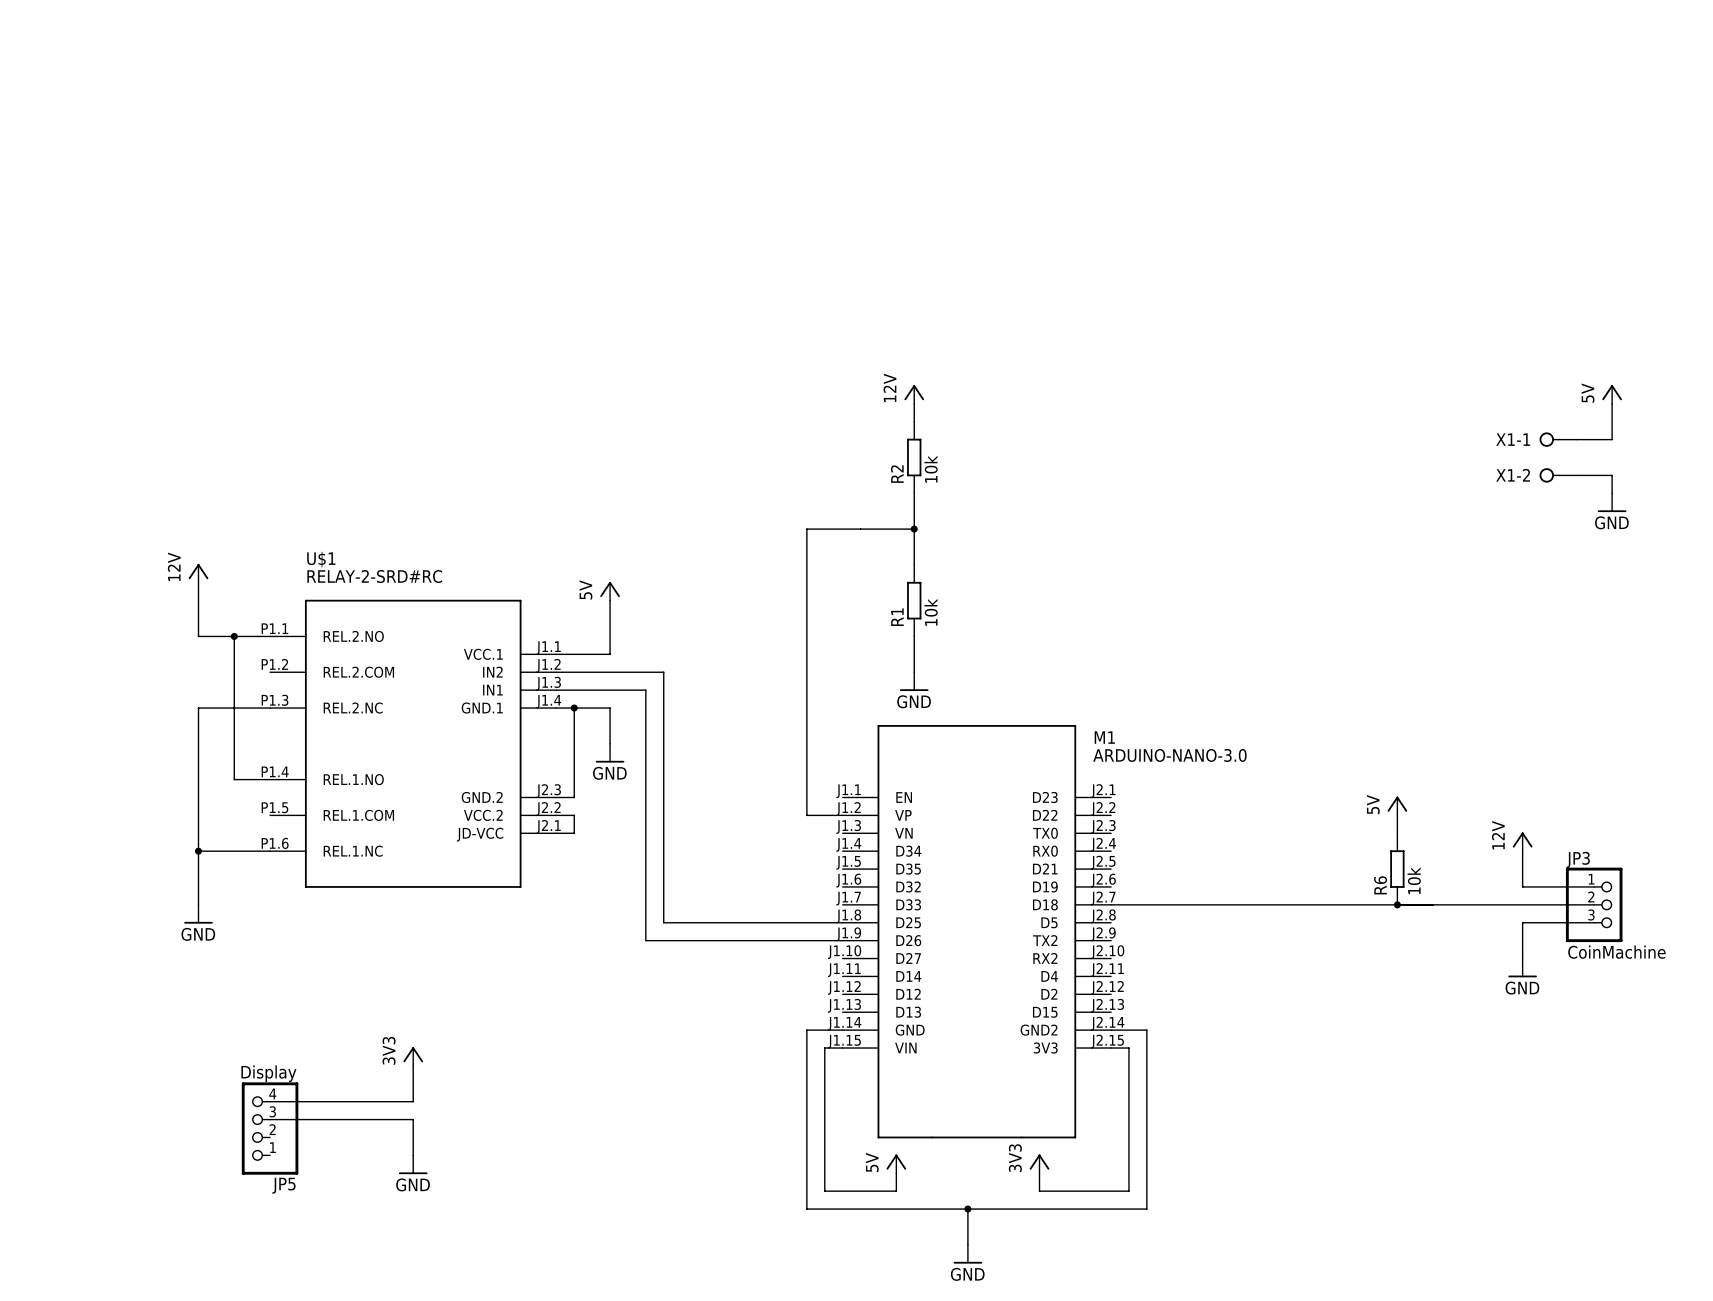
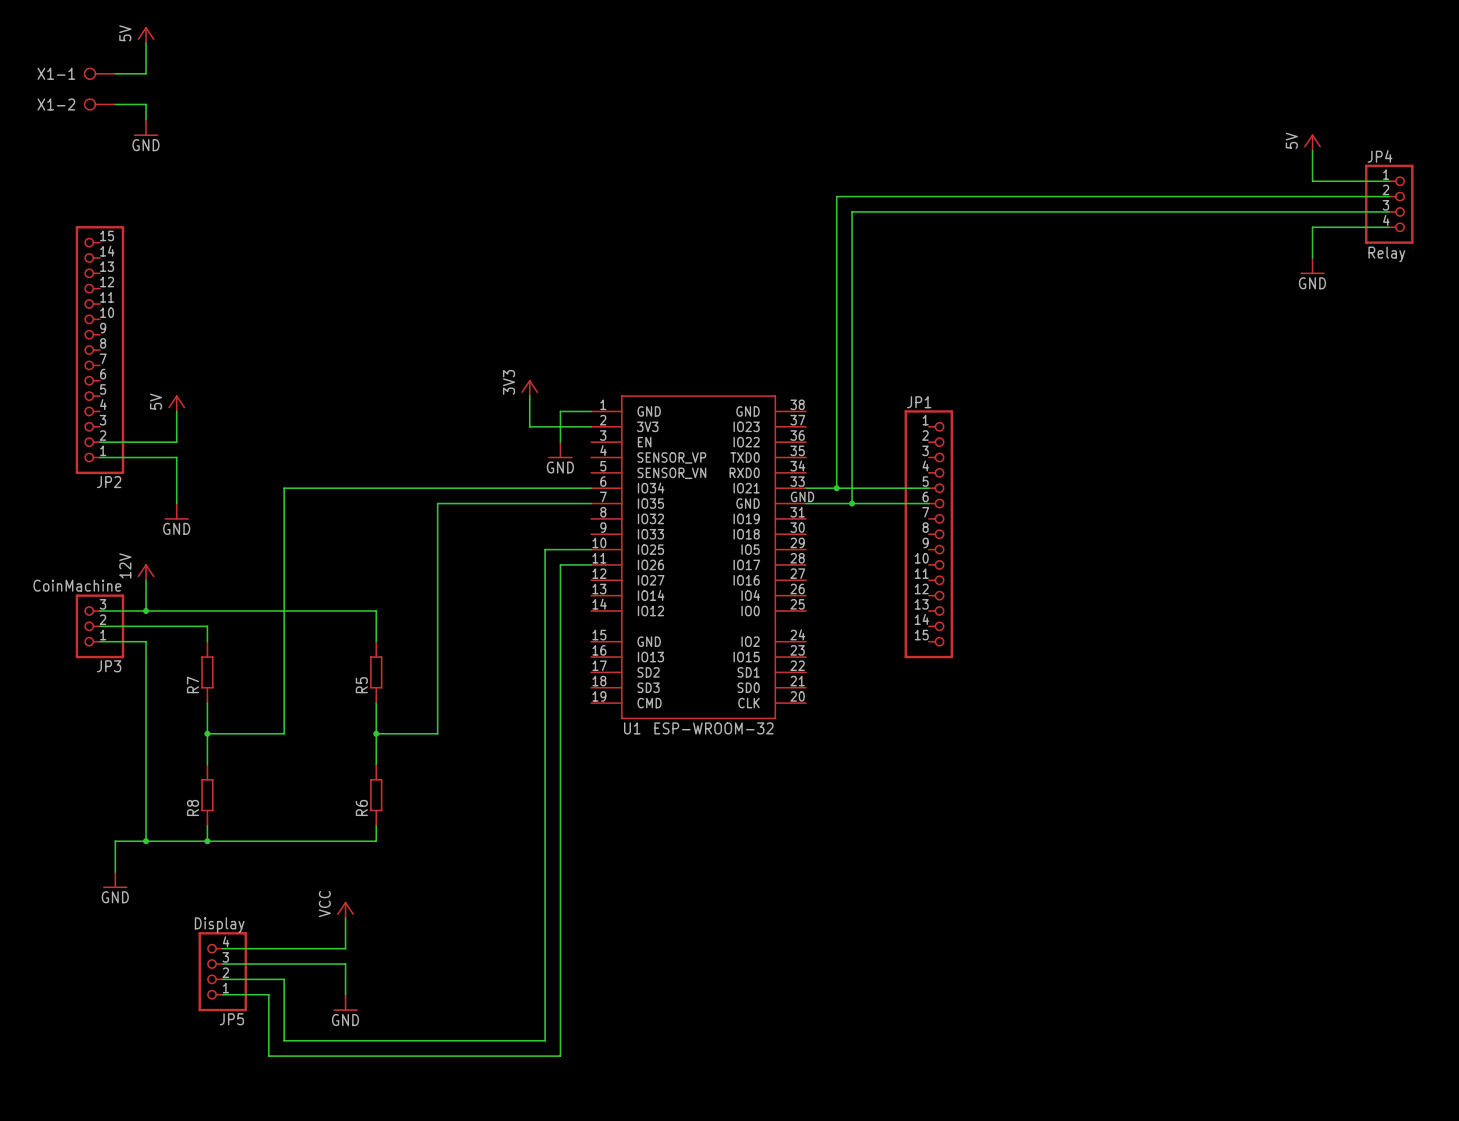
power symbol: none -> 5V (146, 35)
wire: none -> (146, 43) (146, 73) (115, 73)
wire: none -> (115, 104) (146, 104) (146, 119)
power symbol: none -> GND (146, 127)
power symbol: none -> 5V (1312, 142)
wire: none -> (1312, 150) (1312, 181) (1389, 181)
wire: none -> (1389, 196) (836, 196) (836, 488)
JP4: none -> Relay (1389, 204)
wire: none -> (1389, 211) (852, 211) (852, 503)
wire: none -> (1389, 227) (1312, 227) (1312, 257)
power symbol: none -> GND (1312, 266)
power symbol: 12V (914, 394) -> none
power symbol: 5V (1612, 394) -> none
JP2: none -> (99, 350)
wire: (914, 403) (914, 421) -> none
wire: (1612, 403) (1612, 439) (1576, 439) -> none
X1-1 position: (1557, 439) -> (99, 73)
power symbol: none -> 3V3 (529, 388)
wire: none -> (529, 396) (529, 426) (591, 426)
R2: 10k (914, 457) -> none
power symbol: none -> 5V (176, 403)
wire: none -> (176, 411) (176, 442) (99, 442)
wire: none -> (591, 411) (560, 411) (560, 442)
X1-2 position: (1557, 475) -> (99, 104)
wire: (1576, 475) (1612, 475) (1612, 493) -> none
power symbol: GND (1612, 502) -> none
power symbol: none -> GND (560, 450)
wire: none -> (99, 457) (176, 457) (176, 503)
wire: (914, 529) (806, 529) (806, 815) (842, 815) -> none
junction: (914, 529) -> none
wire: none -> (591, 488) (284, 488) (284, 733) (222, 733)
wire: none -> (806, 488) (928, 488)
junction: none -> (836, 488)
power symbol position: 12V (198, 573) -> 12V (146, 572)
wire: (198, 582) (198, 636) (270, 636) -> none
wire: none -> (591, 503) (437, 503) (437, 733) (376, 733)
wire: none -> (806, 503) (928, 503)
junction: none -> (852, 503)
power symbol: 5V (610, 591) -> none
power symbol: none -> GND (176, 511)
wire: (610, 600) (610, 654) (556, 654) -> none
R1: 10k (914, 600) -> none
JP1: none -> (928, 534)
wire: (234, 636) (234, 779) (270, 779) -> none
junction: (234, 636) -> none
U1: none -> ESP-WROOM-32 (698, 557)
wire: none -> (146, 580) (146, 611)
wire: (556, 672) (663, 672) -> (591, 564) (560, 564) (560, 580)
power symbol: GND (914, 681) -> none
wire: (556, 690) (645, 690) -> (591, 549) (545, 549) (545, 595)
junction: none -> (146, 611)
wire: (198, 708) (198, 904) -> (161, 611) (99, 611)
wire: none -> (222, 611) (376, 611) (376, 641)
wire: (556, 708) (610, 708) (610, 743) -> none
wire: (574, 708) (574, 797) (556, 797) -> none
junction: (574, 708) -> none
wire: none -> (99, 626) (207, 626) (207, 641)
wire: none -> (99, 641) (146, 641) (146, 841)
U$1: RELAY-2-SRD#RC (413, 743) -> none
power symbol: GND (610, 753) -> none
R7: none -> (207, 672)
R5: none -> (376, 672)
power symbol: 5V (1397, 805) -> none
wire: none -> (207, 703) (207, 764)
wire: none -> (376, 703) (376, 764)
wire: (556, 815) (574, 815) (574, 833) (556, 833) -> none
wire: (1397, 815) (1397, 833) -> none
power symbol: 12V (1522, 841) -> none
wire: (198, 851) (252, 851) -> none
junction: (198, 851) -> none
junction: none -> (207, 733)
junction: none -> (376, 733)
wire: (1522, 851) (1522, 886) (1594, 886) -> none
R6 position: (1397, 869) -> (376, 795)
R6 value: 10k (1414, 880) -> none
wire: (1111, 904) (1594, 904) -> none
junction: (1397, 904) -> none
JP3 rotation: 0° (1594, 904) -> 180° (99, 626)
JP3 position: (1594, 904) -> (99, 626)
power symbol position: GND (198, 914) -> GND (115, 879)
R8: none -> (207, 795)
wire: (663, 922) (842, 922) -> (560, 795) (560, 1056) (268, 1056) (268, 994) (222, 994)
wire: (1594, 922) (1522, 922) (1522, 958) -> none
M1: ARDUINO-NANO-3.0 (976, 931) -> none
wire: (645, 940) (842, 940) -> (545, 810) (545, 1040) (284, 1040) (284, 979) (222, 979)
wire: none -> (207, 825) (207, 841)
wire: none -> (376, 825) (376, 841) (115, 841) (115, 871)
power symbol: GND (1522, 967) -> none
junction: none -> (146, 841)
junction: none -> (207, 841)
wire: (842, 1030) (806, 1030) (806, 1209) (1146, 1209) (1146, 1030) (1111, 1030) -> none
wire: (842, 1048) (824, 1048) (824, 1191) (896, 1191) (896, 1173) -> none
wire: (1111, 1048) (1128, 1048) (1128, 1191) (1039, 1191) (1039, 1173) -> none
power symbol: 3V3 (413, 1056) -> VCC (345, 909)
power symbol: 5V (896, 1163) -> none
power symbol: 3V3 (1039, 1163) -> none
wire: (967, 1209) (967, 1244) -> none
junction: (967, 1209) -> none
power symbol: GND (967, 1254) -> none

